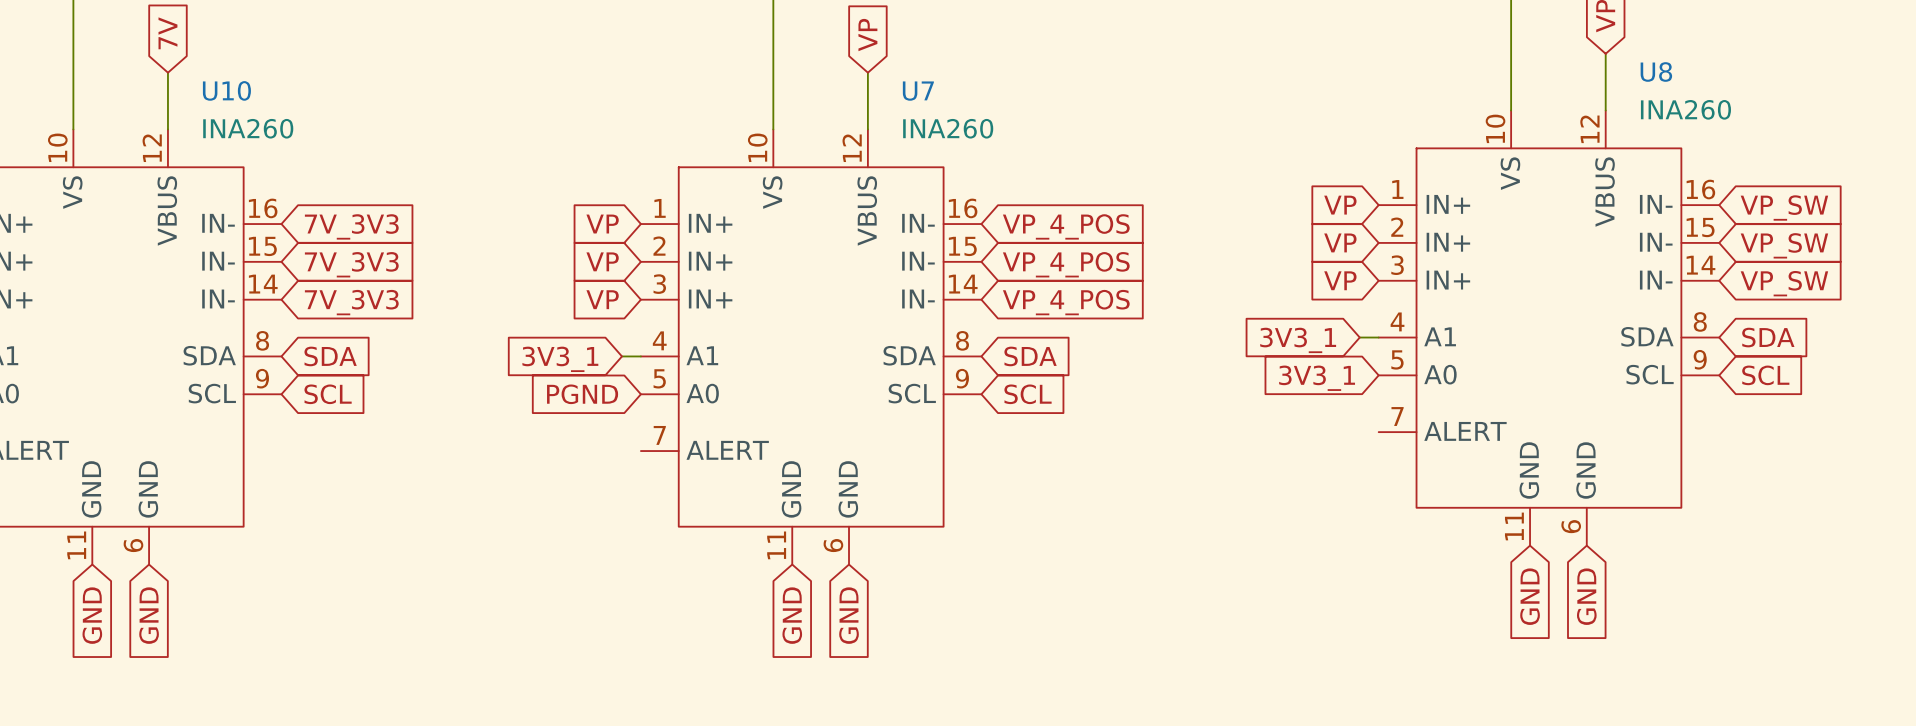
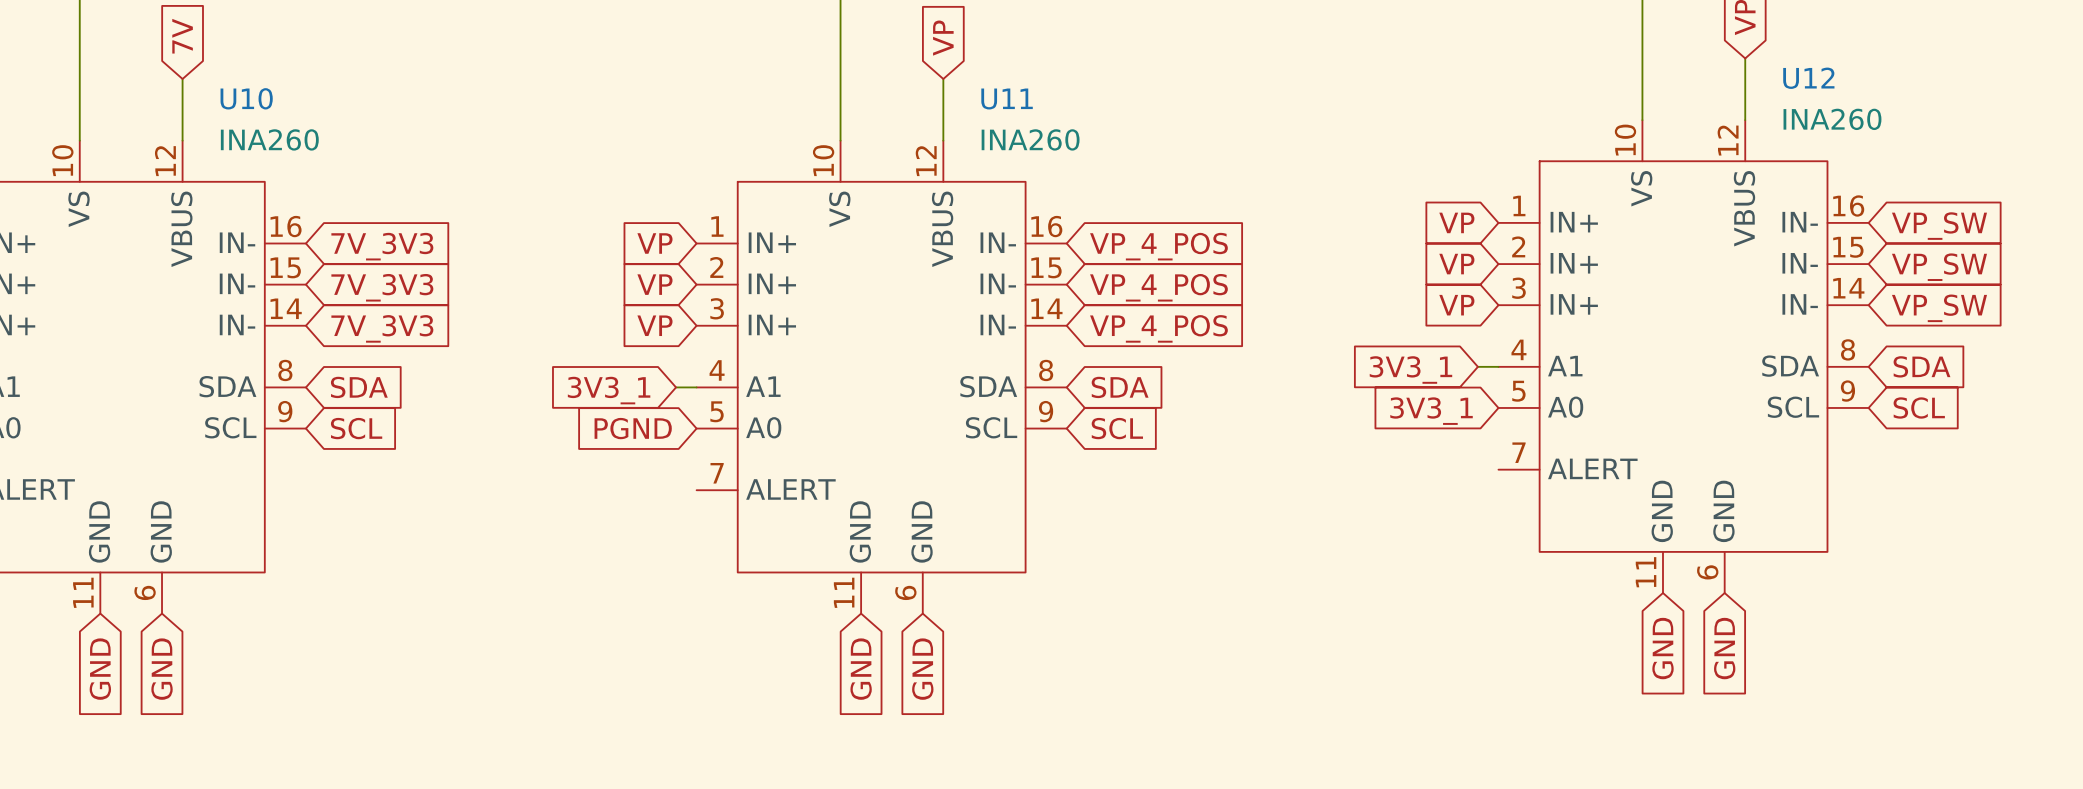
U8 name: U8 (1656, 71) -> U12 (1808, 78)
U7 name: U7 (918, 91) -> U11 (1007, 98)

